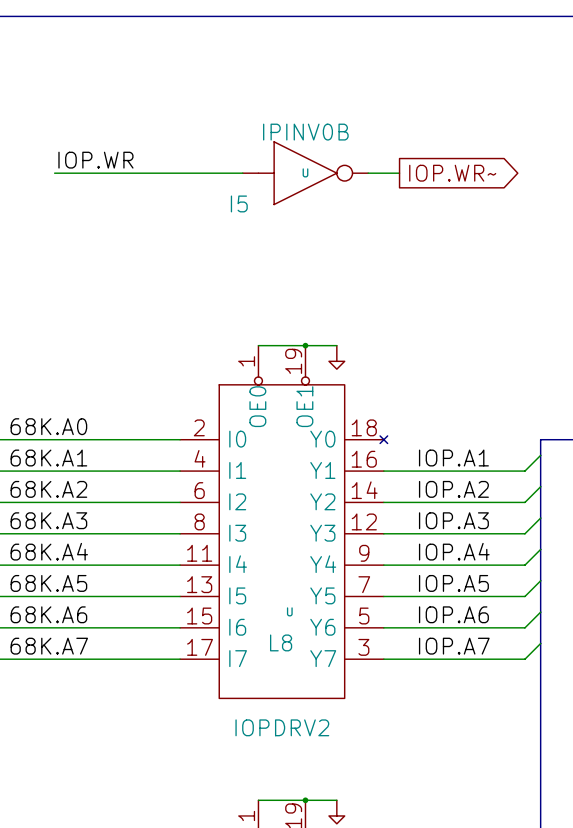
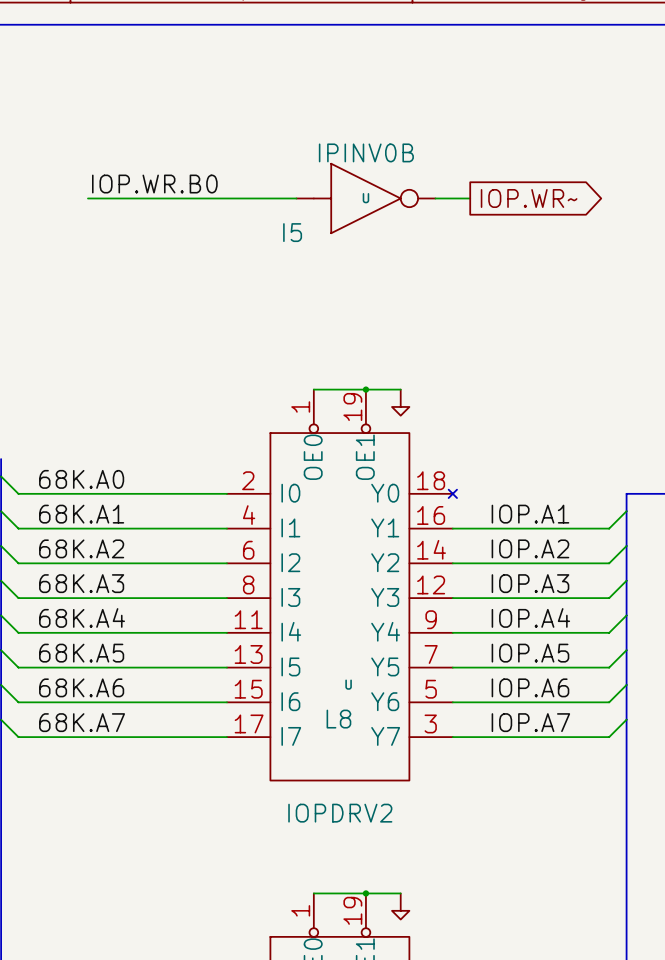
label: IOP.WR (95, 160) -> IOP.WR.B0 (154, 184)

